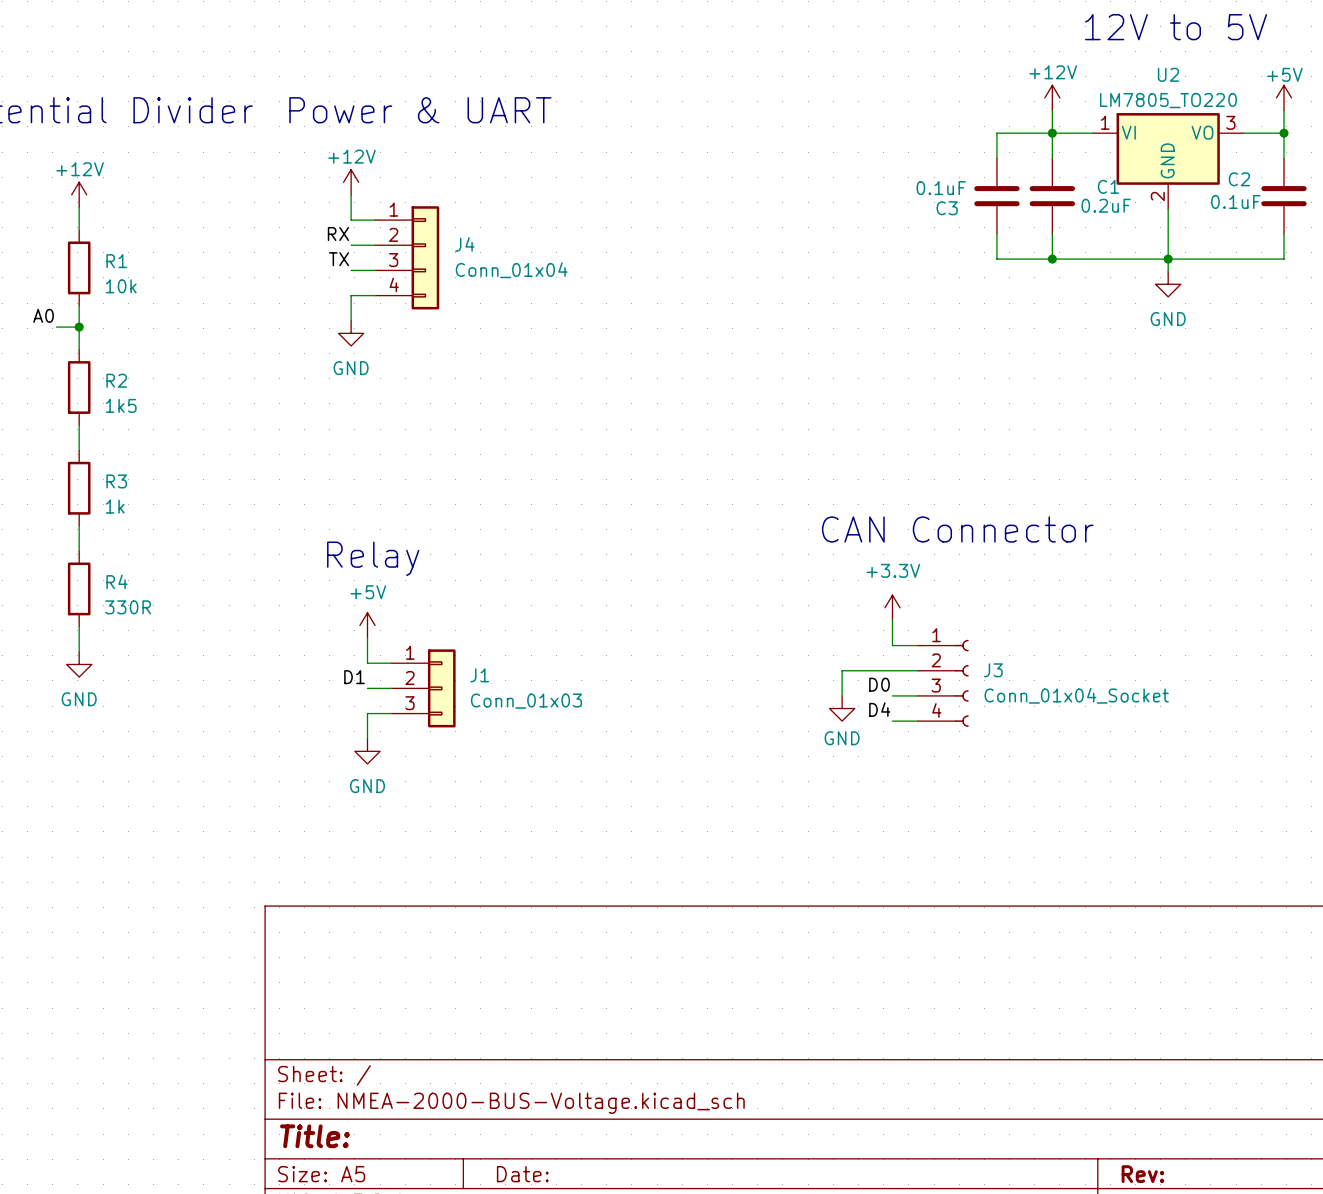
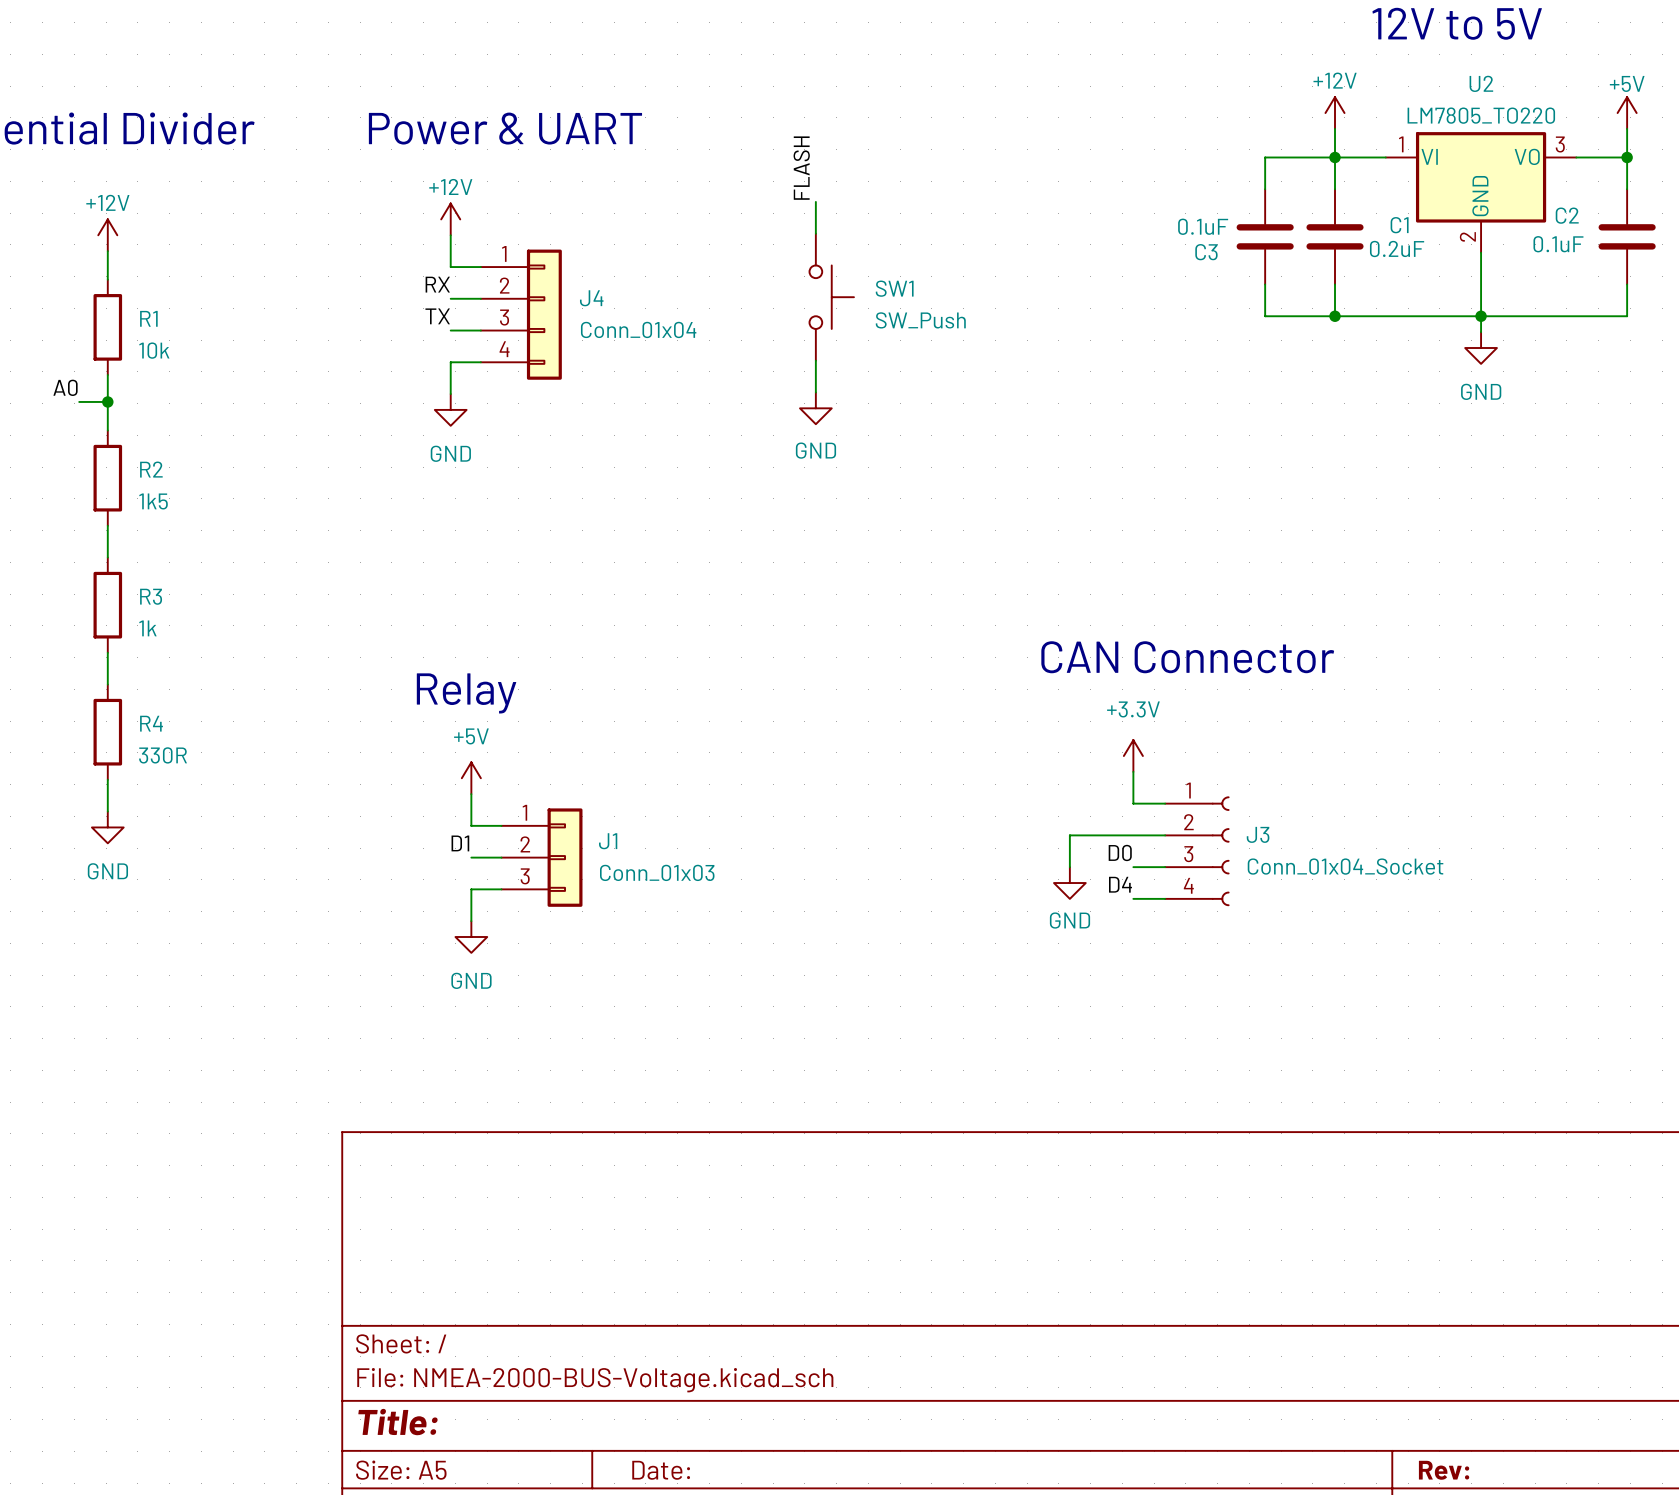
label: none -> FLASH (801, 168)
wire: none -> (815, 201) (815, 233)
SW1: none -> SW_Push (831, 297)
wire: none -> (815, 360) (815, 392)
power symbol: none -> GND (815, 408)

